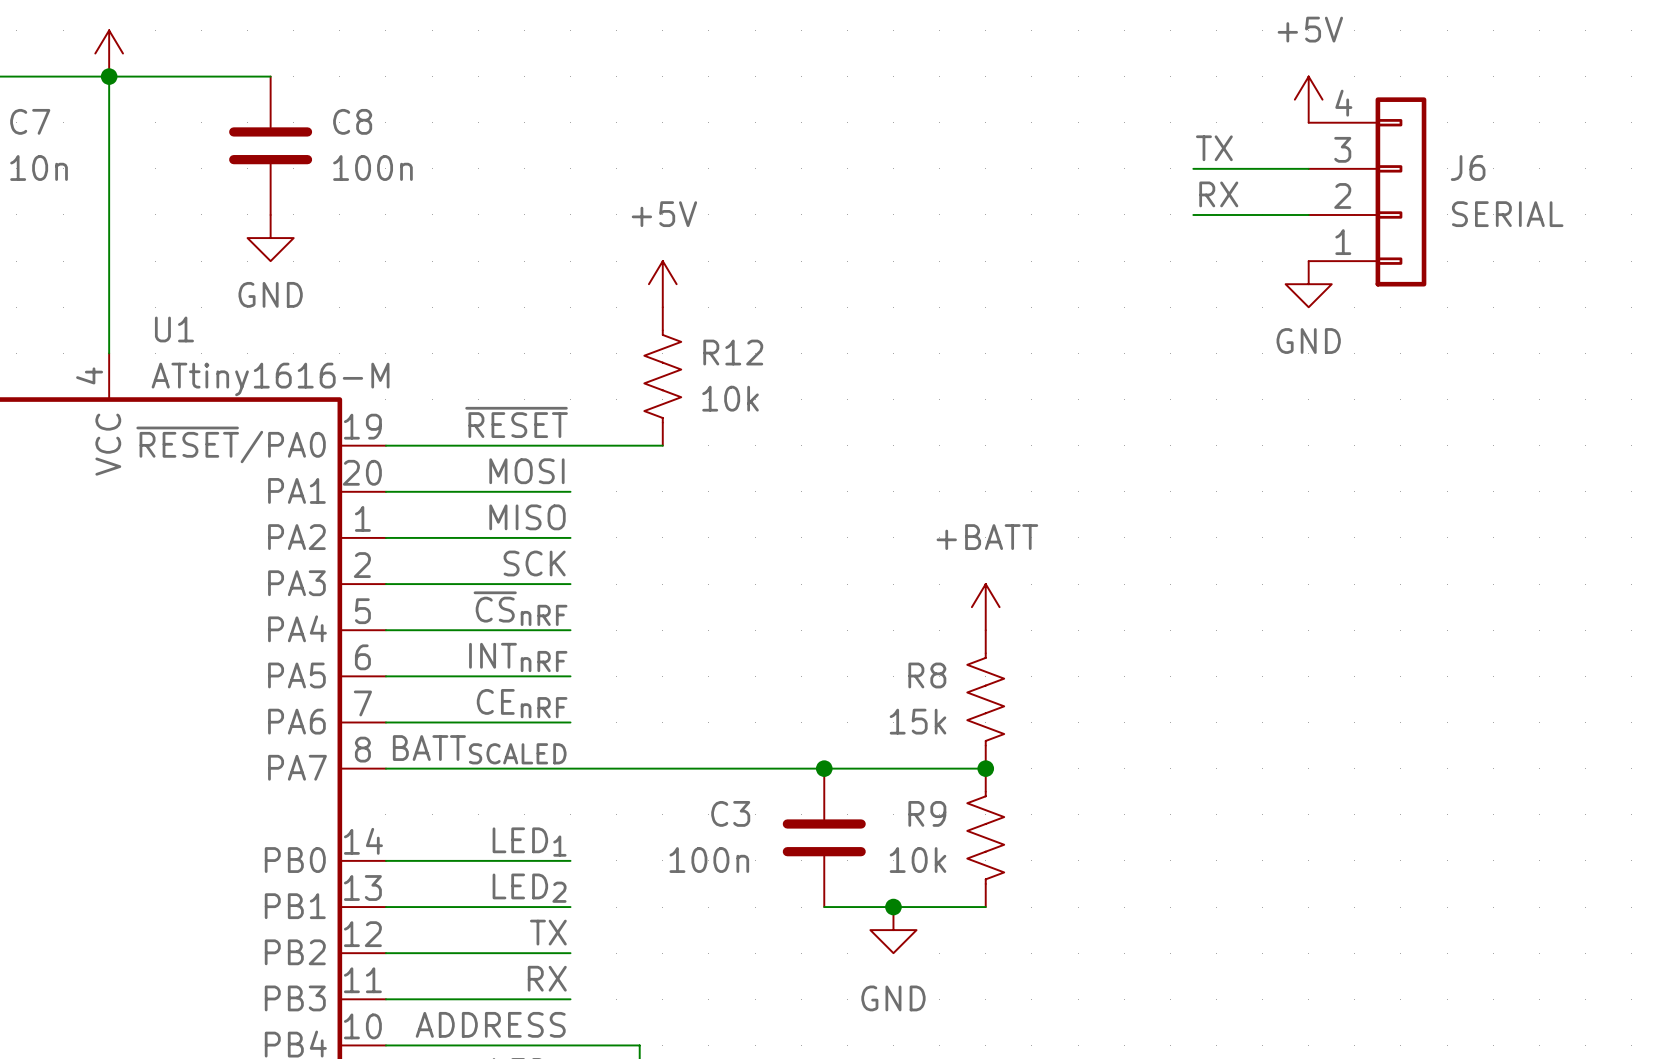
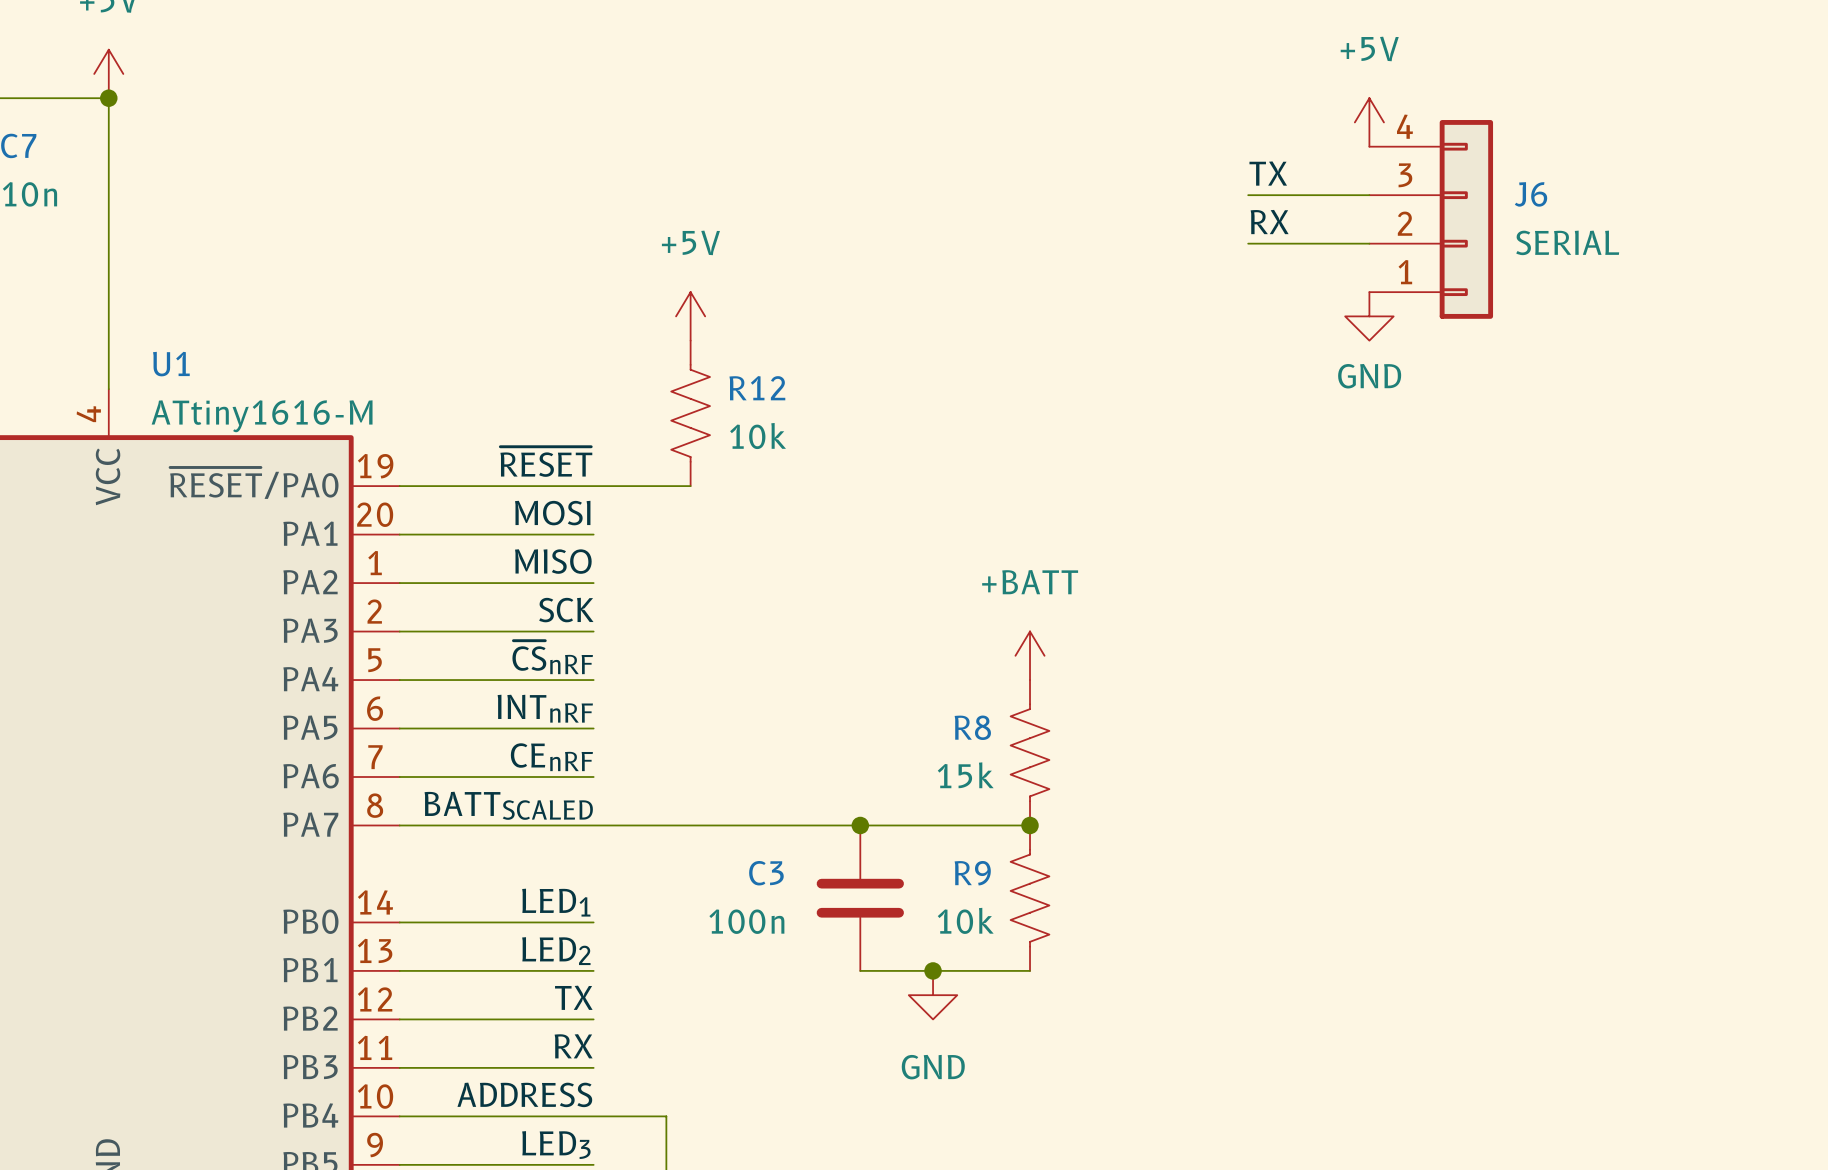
wire: (109, 76) (270, 76) -> none
C8: 100n (270, 145) -> none
power symbol: GND (270, 238) -> none

